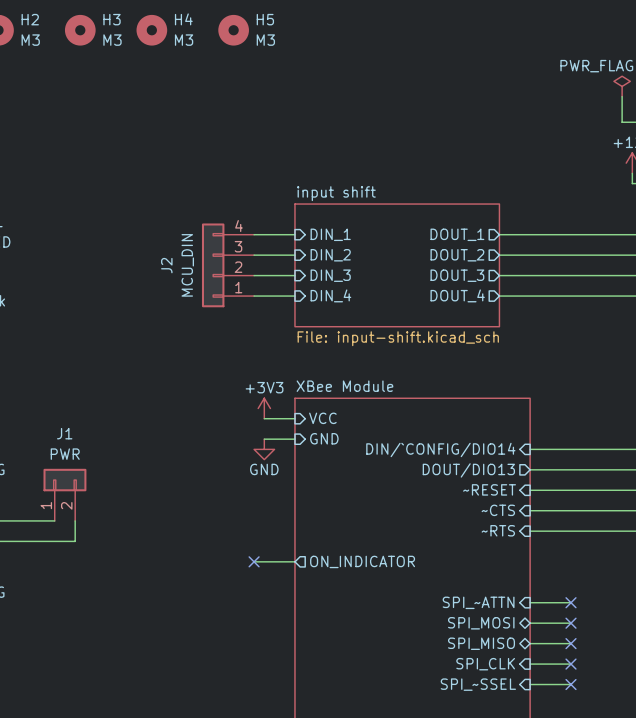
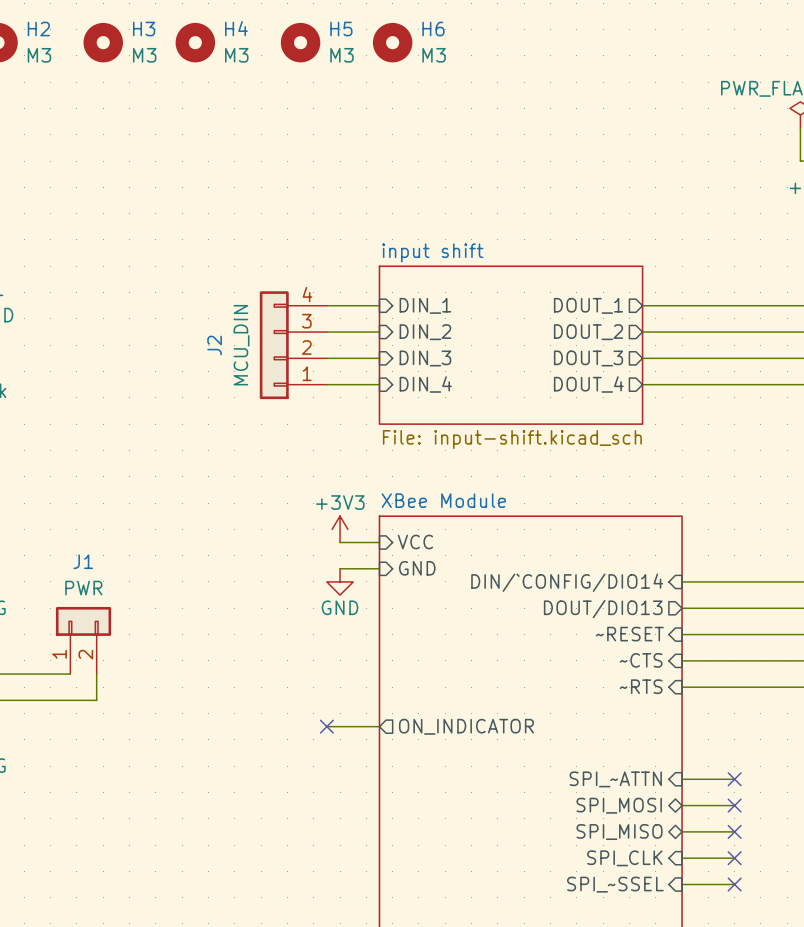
H6: none -> M3 (392, 42)

